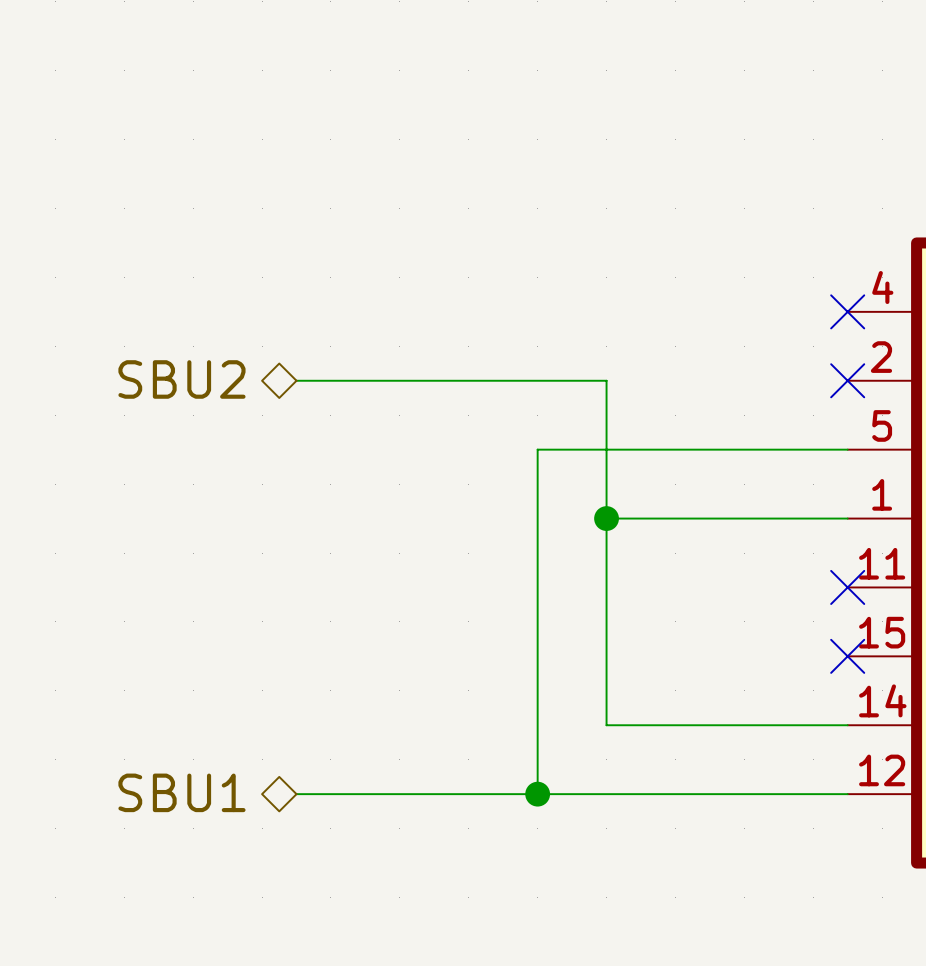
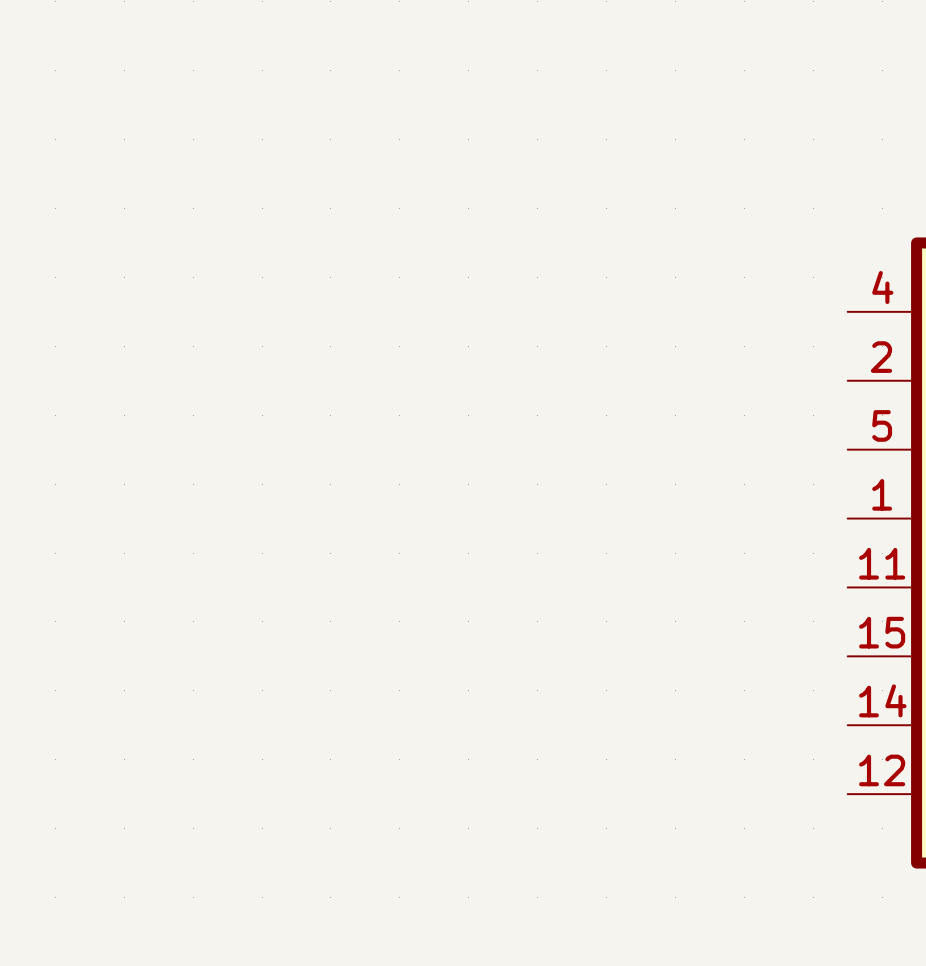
no-connect mark: (847, 311) -> none
hierarchical label: SBU2 (181, 379) -> none
wire: (296, 380) (606, 380) (606, 725) (847, 725) -> none
no-connect mark: (847, 380) -> none
wire: (847, 449) (537, 449) (537, 794) -> none
wire: (606, 518) (847, 518) -> none
junction: (606, 518) -> none
no-connect mark: (847, 587) -> none
no-connect mark: (847, 656) -> none
hierarchical label: SBU1 (181, 792) -> none
wire: (296, 794) (847, 794) -> none
junction: (537, 794) -> none

